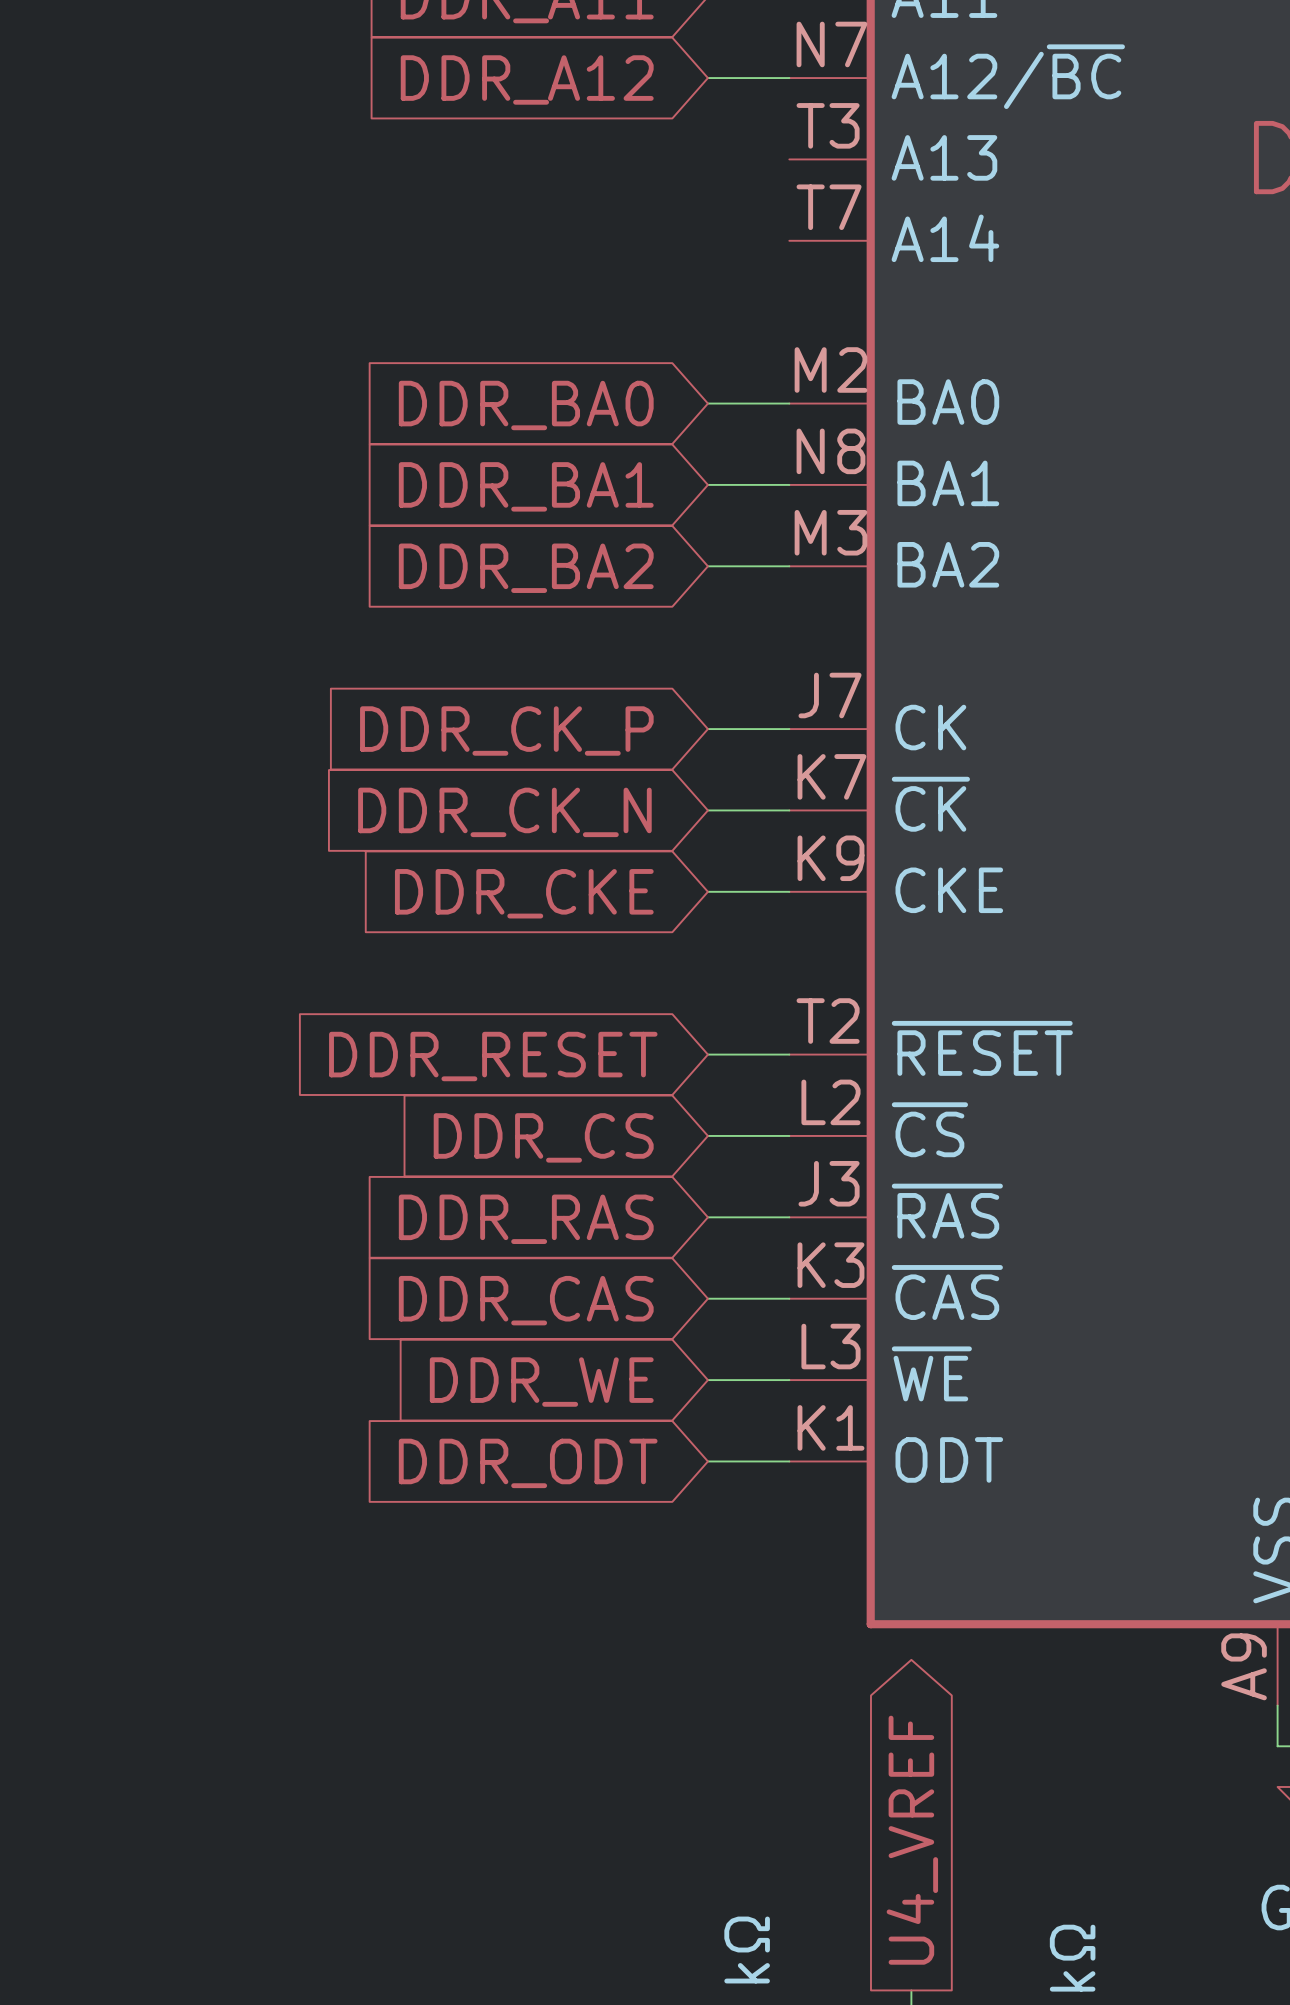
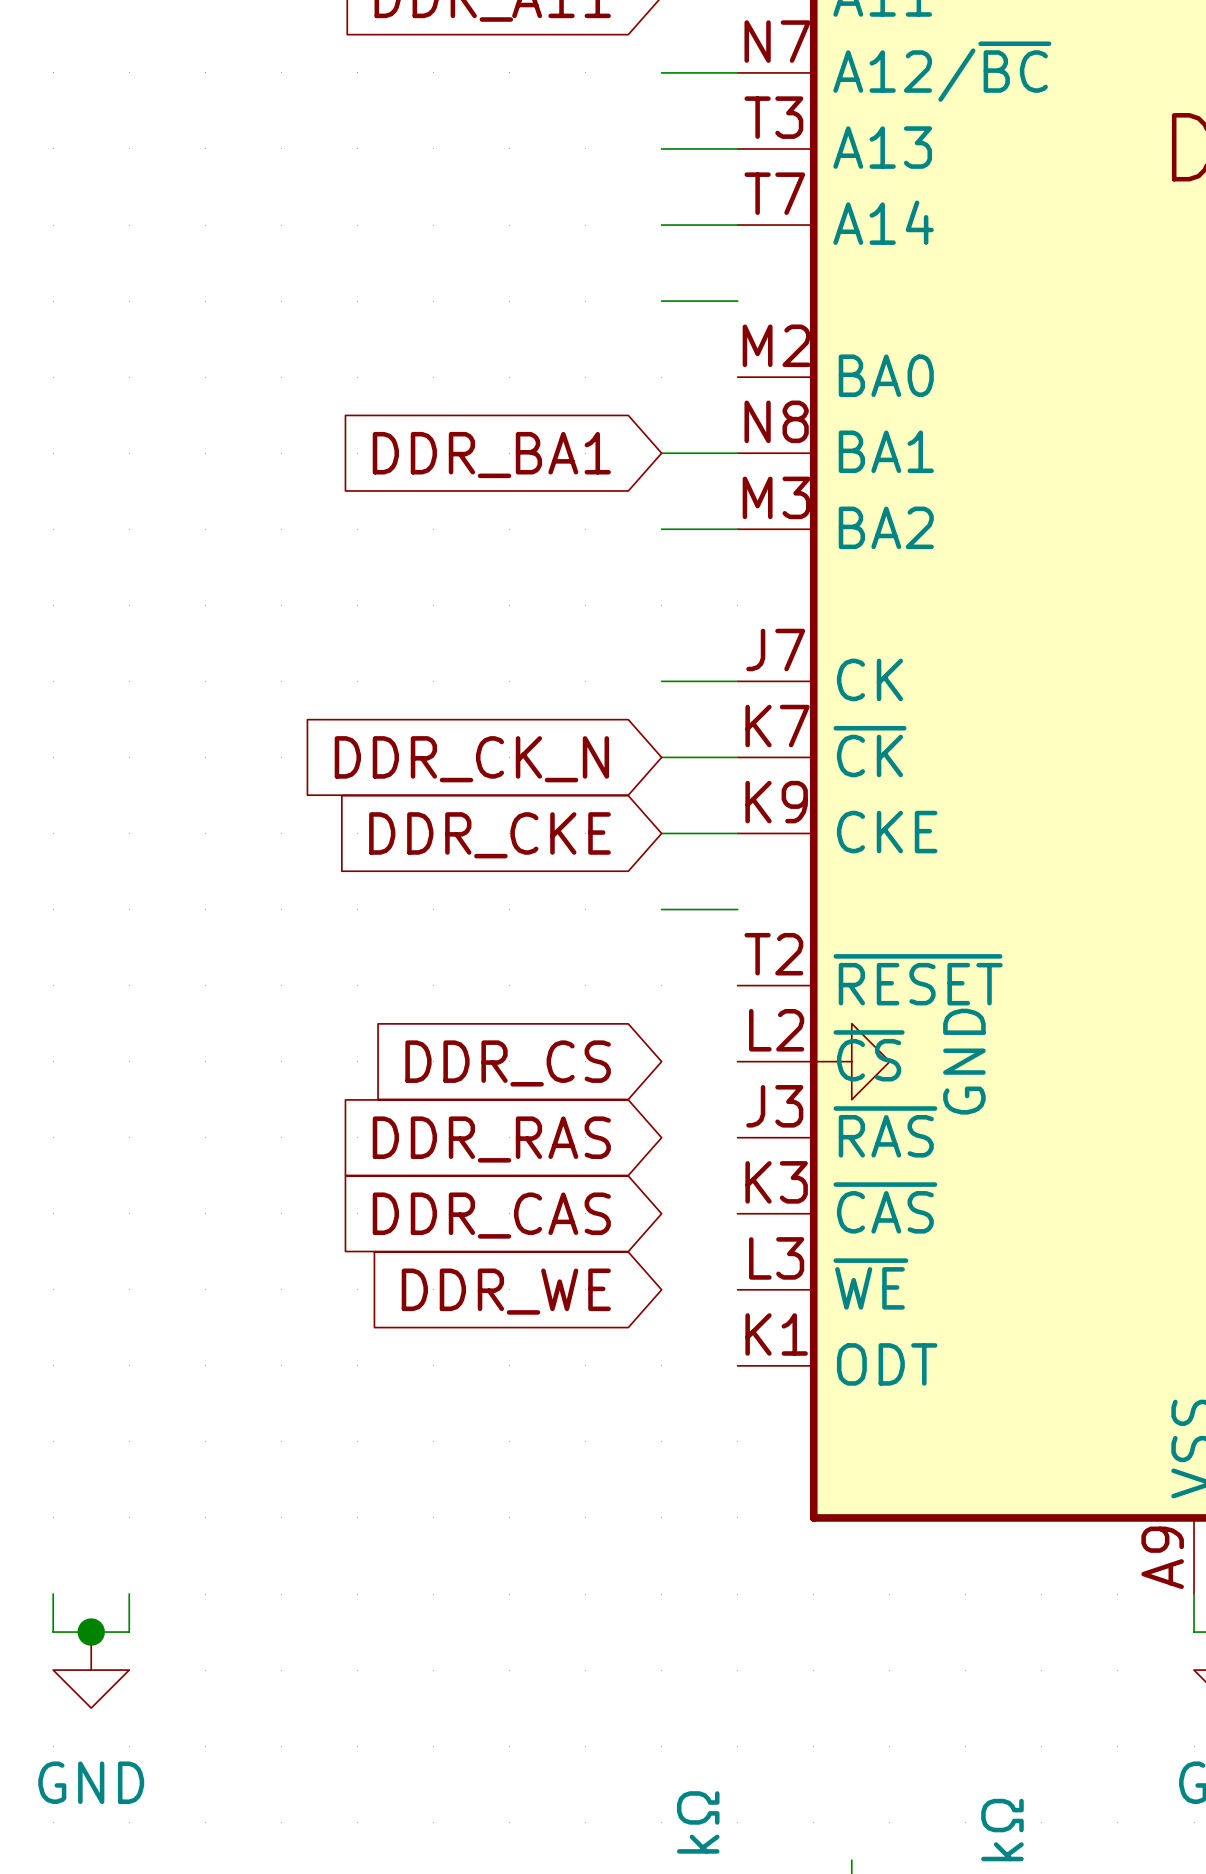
global label: DDR_A12 (527, 79) -> none
wire: none -> (661, 148) (737, 148)
wire: none -> (661, 225) (737, 225)
wire: (707, 403) (789, 403) -> (661, 301) (737, 301)
global label: DDR_BA0 (526, 405) -> none
global label: DDR_BA2 (526, 568) -> none
global label: DDR_CK_P (506, 731) -> none
wire: (707, 1054) (789, 1054) -> (661, 909) (737, 909)
global label: DDR_RESET (493, 1056) -> none
wire: (707, 1135) (789, 1135) -> none
power symbol: none -> GND (851, 1061)
wire: (707, 1217) (789, 1217) -> none
wire: (707, 1298) (789, 1298) -> none
wire: (707, 1380) (789, 1380) -> none
wire: (707, 1461) (789, 1461) -> none
global label: DDR_ODT (528, 1463) -> none
wire: none -> (53, 1594) (53, 1632) (129, 1632) (129, 1594)
junction: none -> (91, 1632)
power symbol: none -> GND (91, 1670)
global label: U4_VREF (912, 1840) -> none

